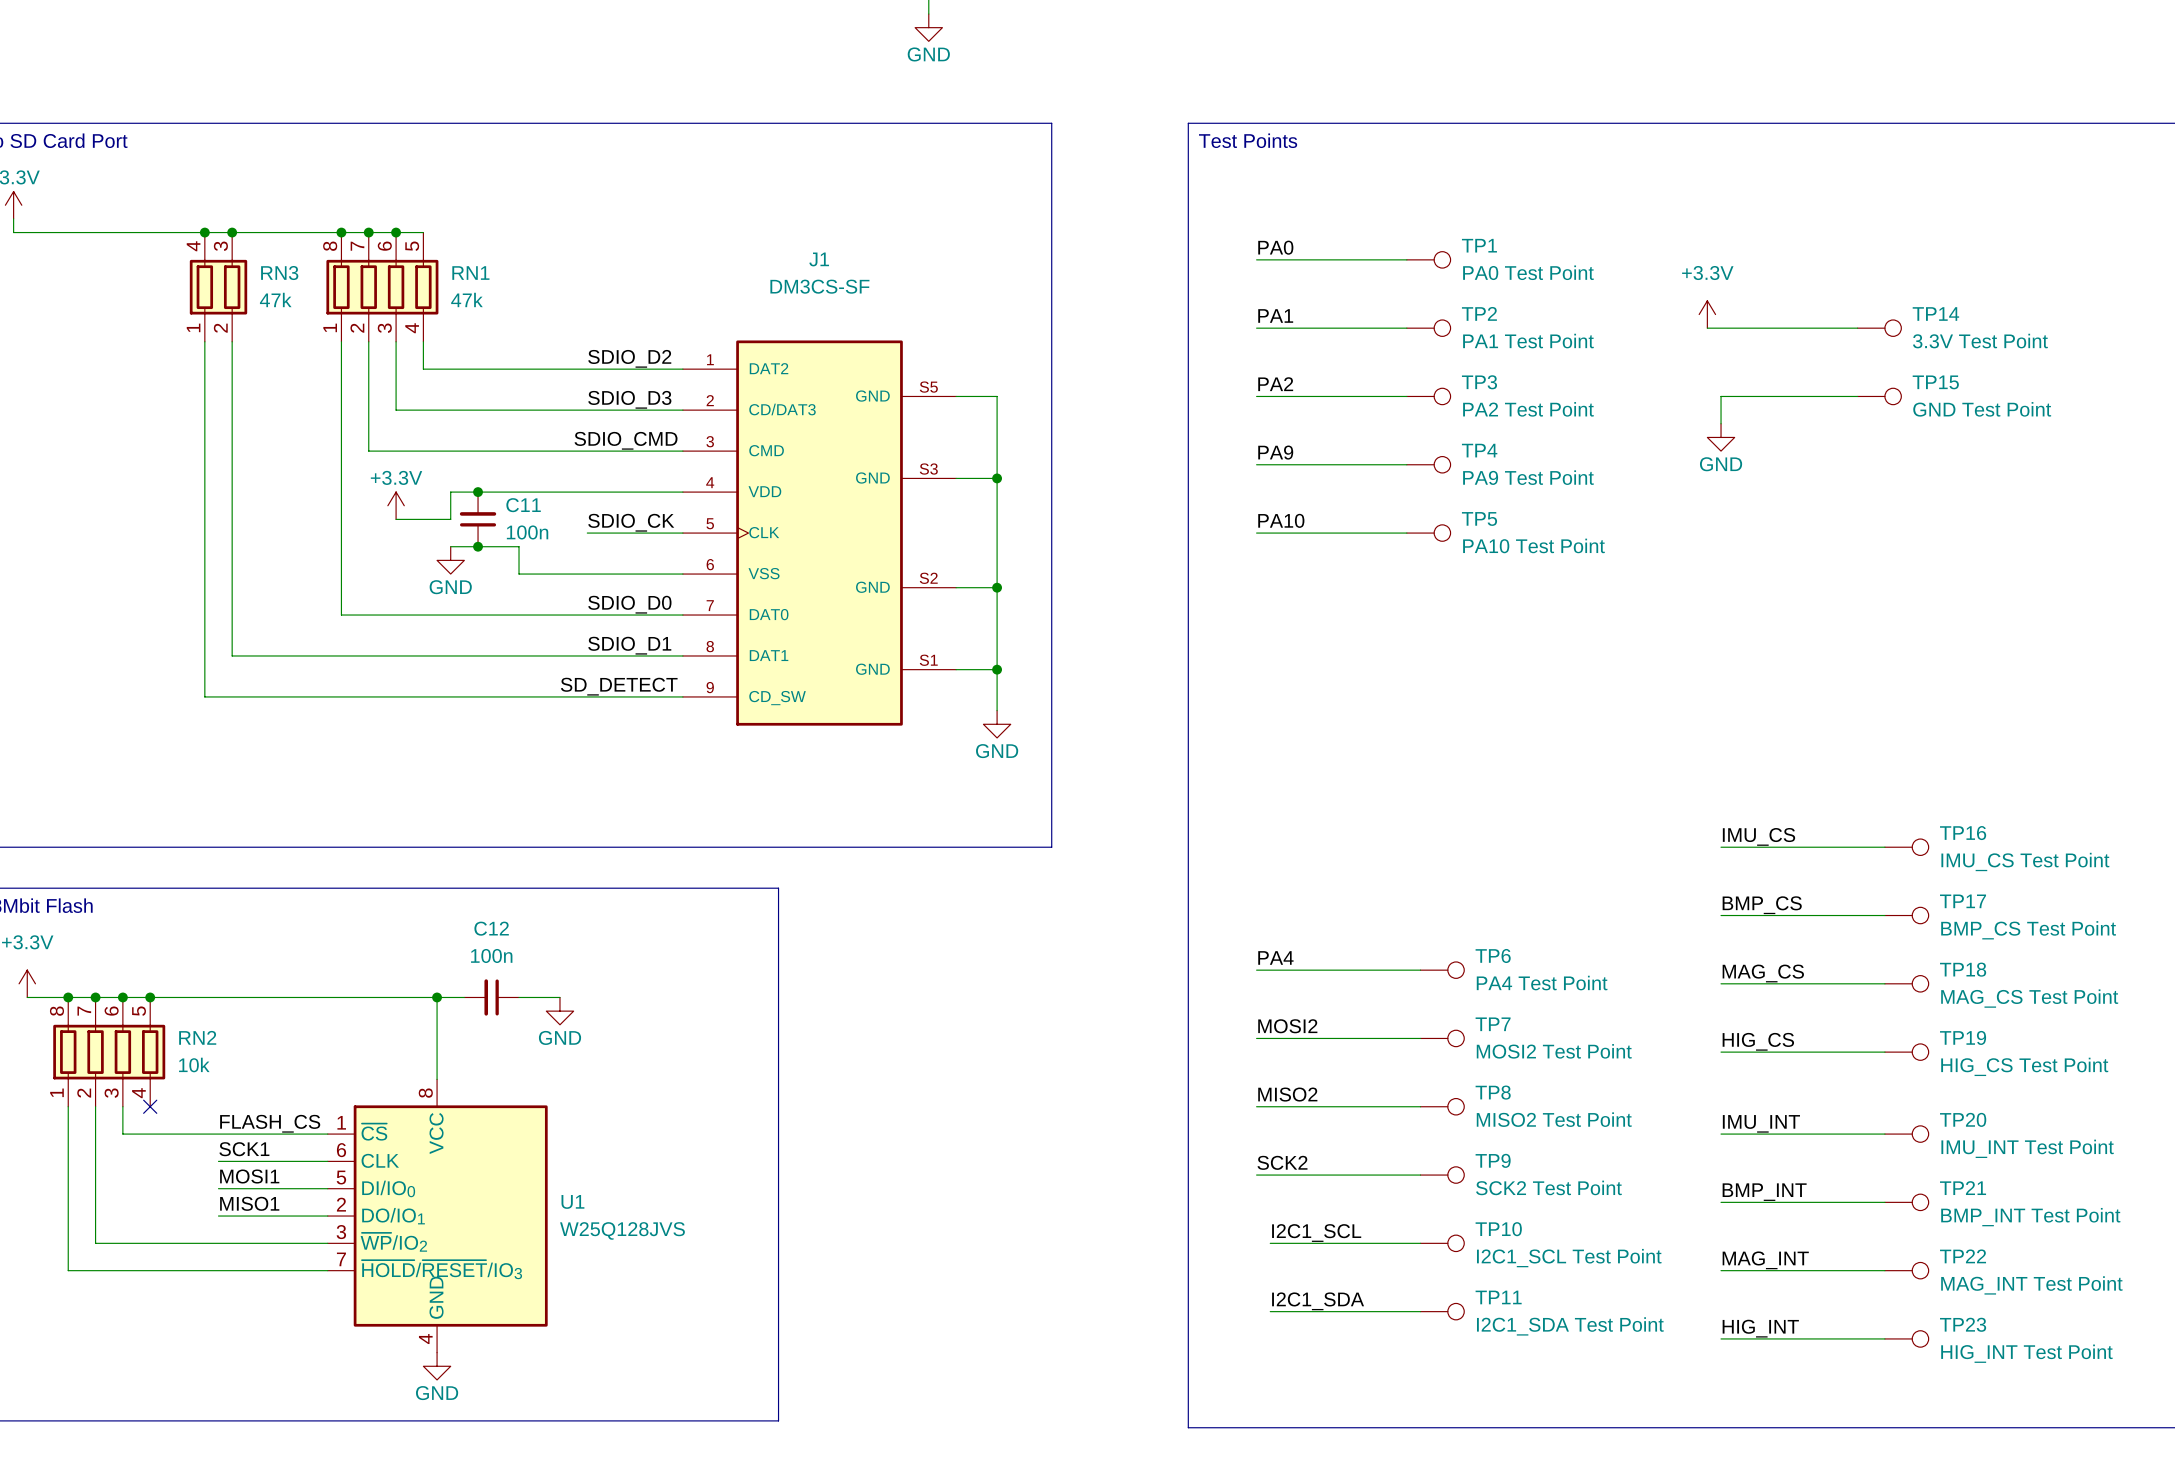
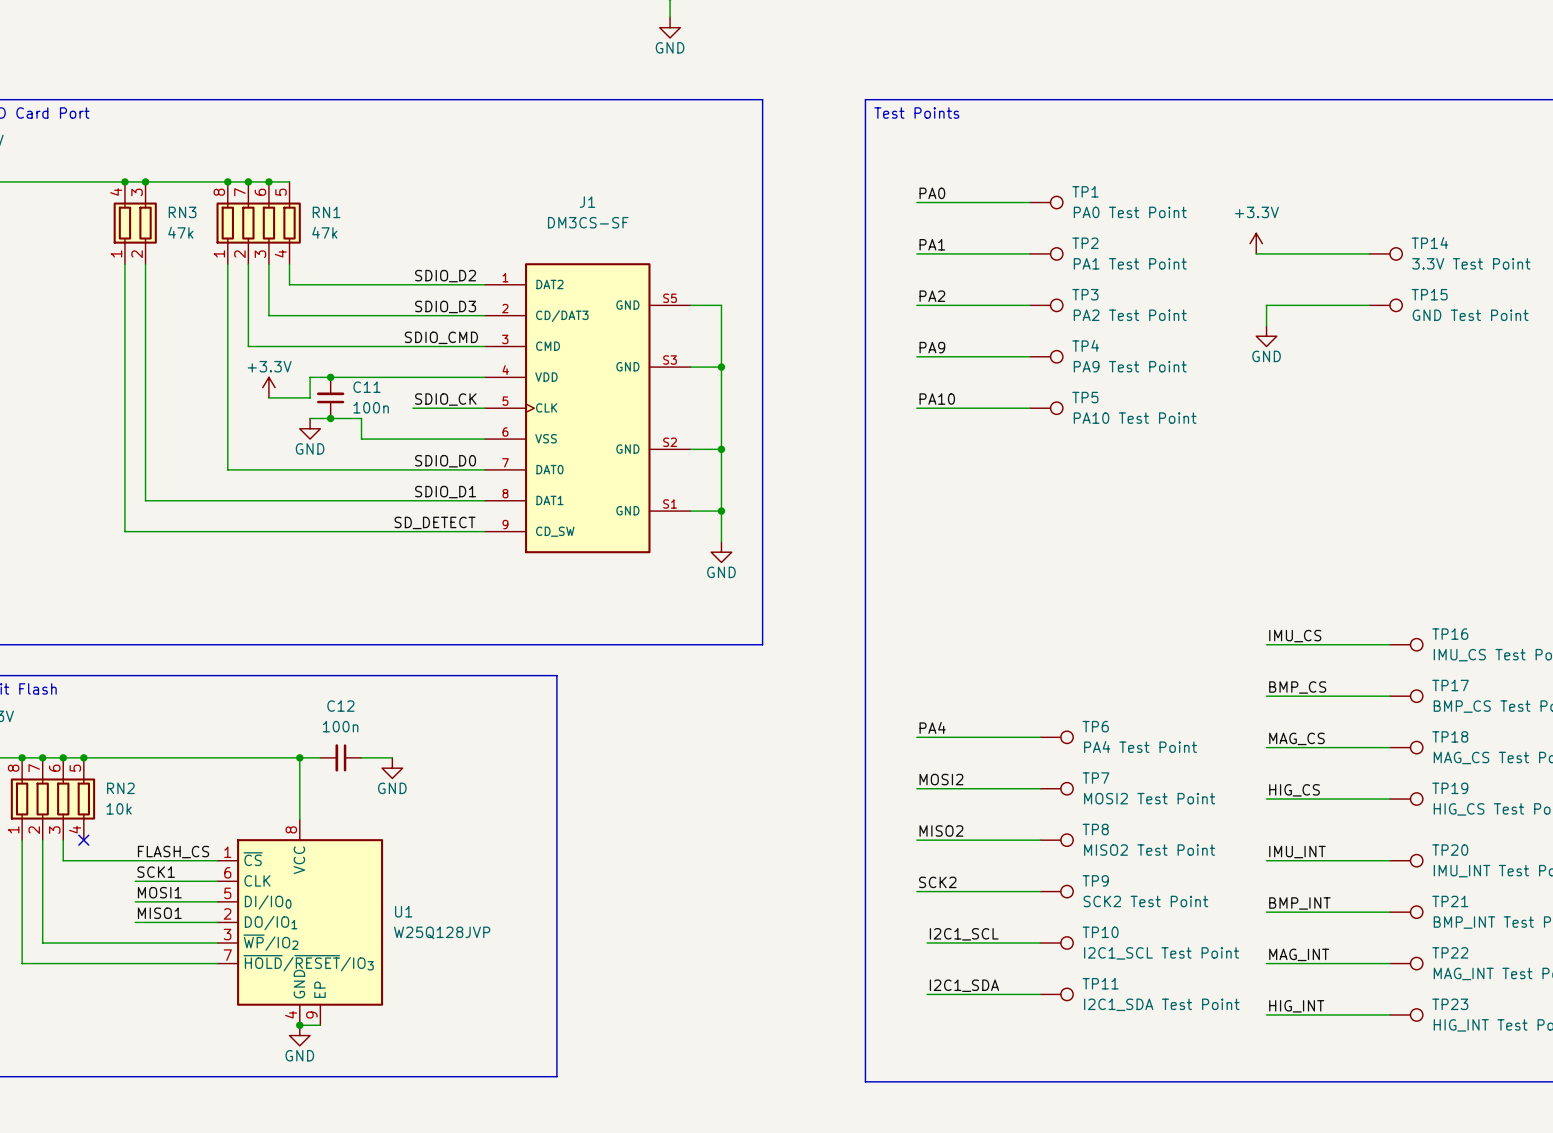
U1 symbol: [327, 1079, 548, 1353] -> [217, 819, 384, 1026]
U1 value: W25Q128JVS (622, 1230) -> W25Q128JVP (442, 932)
wire: none -> (299, 1025) (320, 1025)
junction: none -> (299, 1025)

